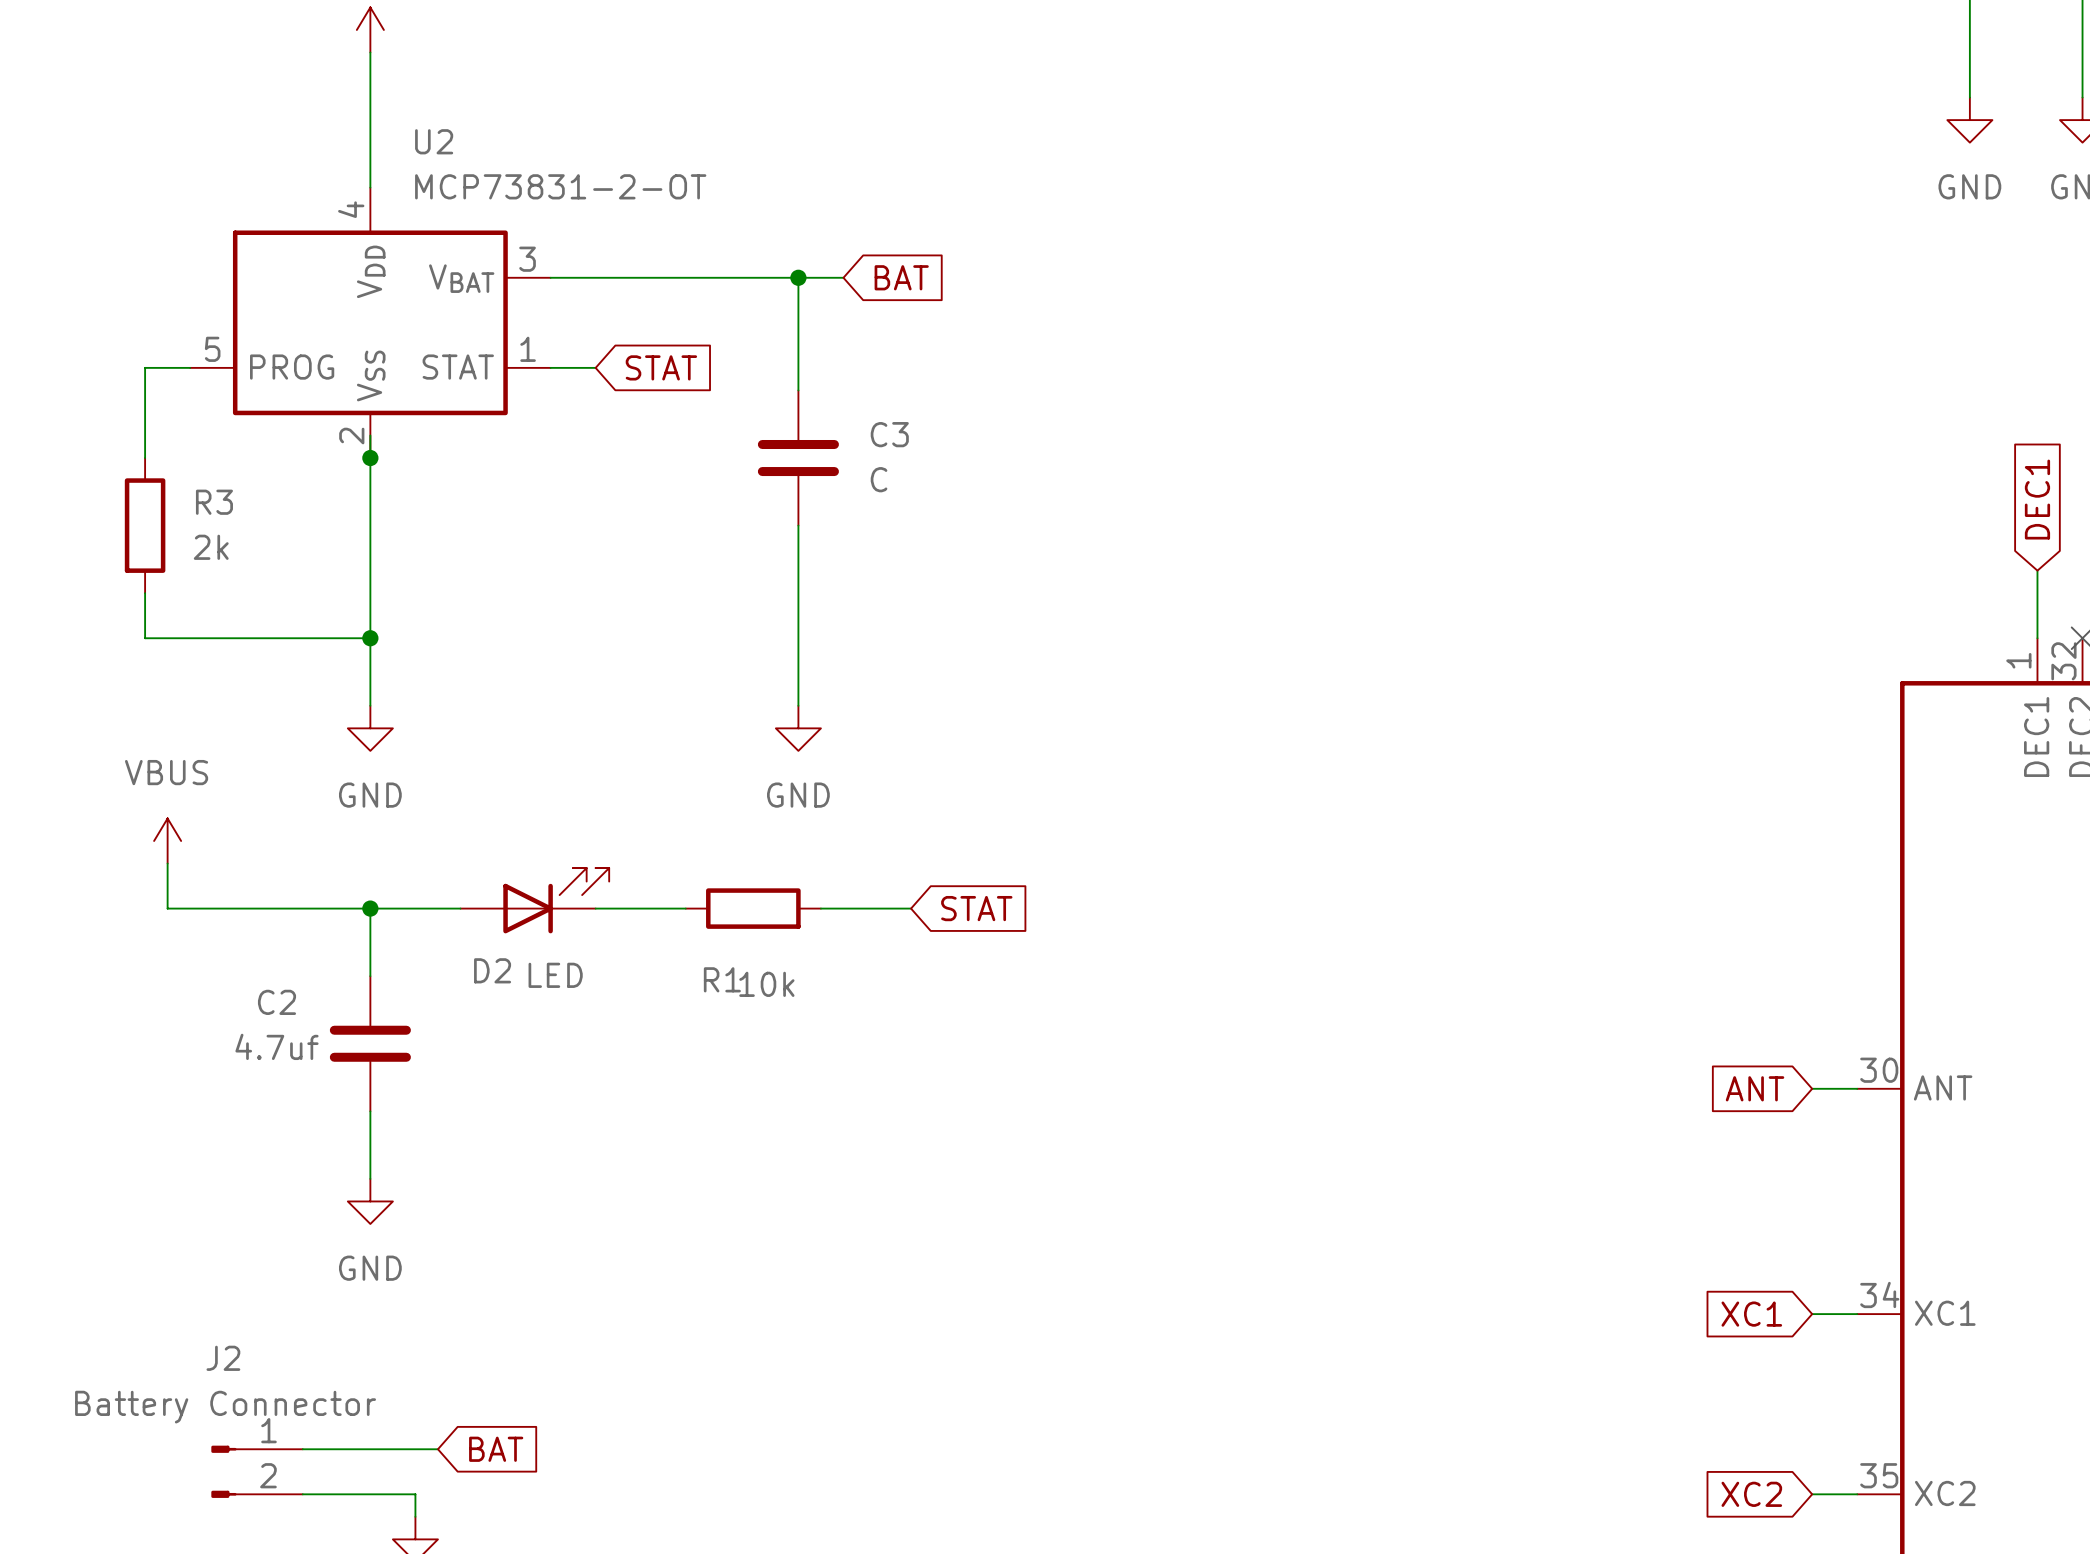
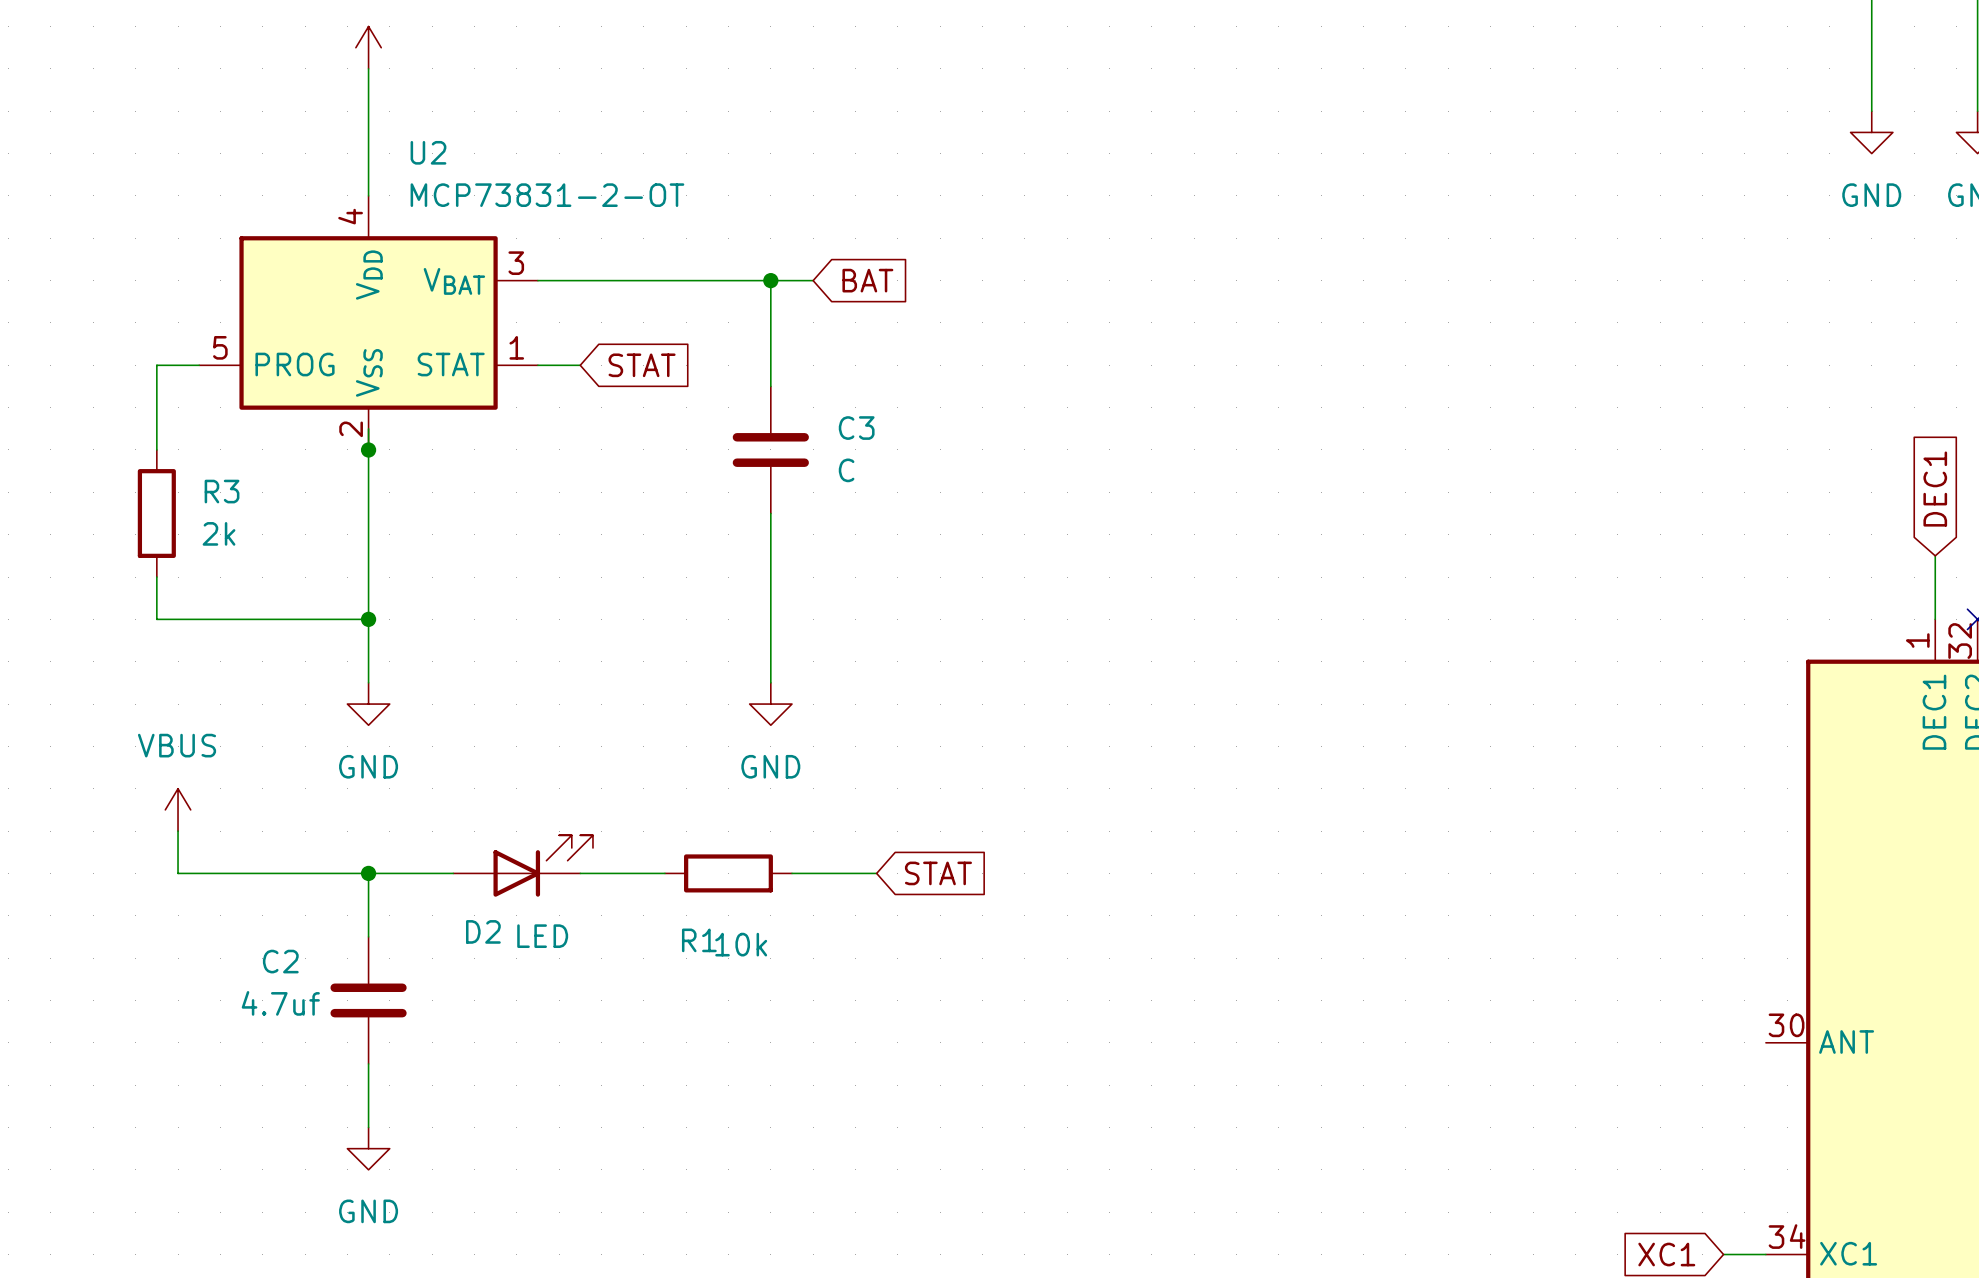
global label: ANT (1755, 1088) -> none
wire: (1812, 1088) (1857, 1088) -> none

